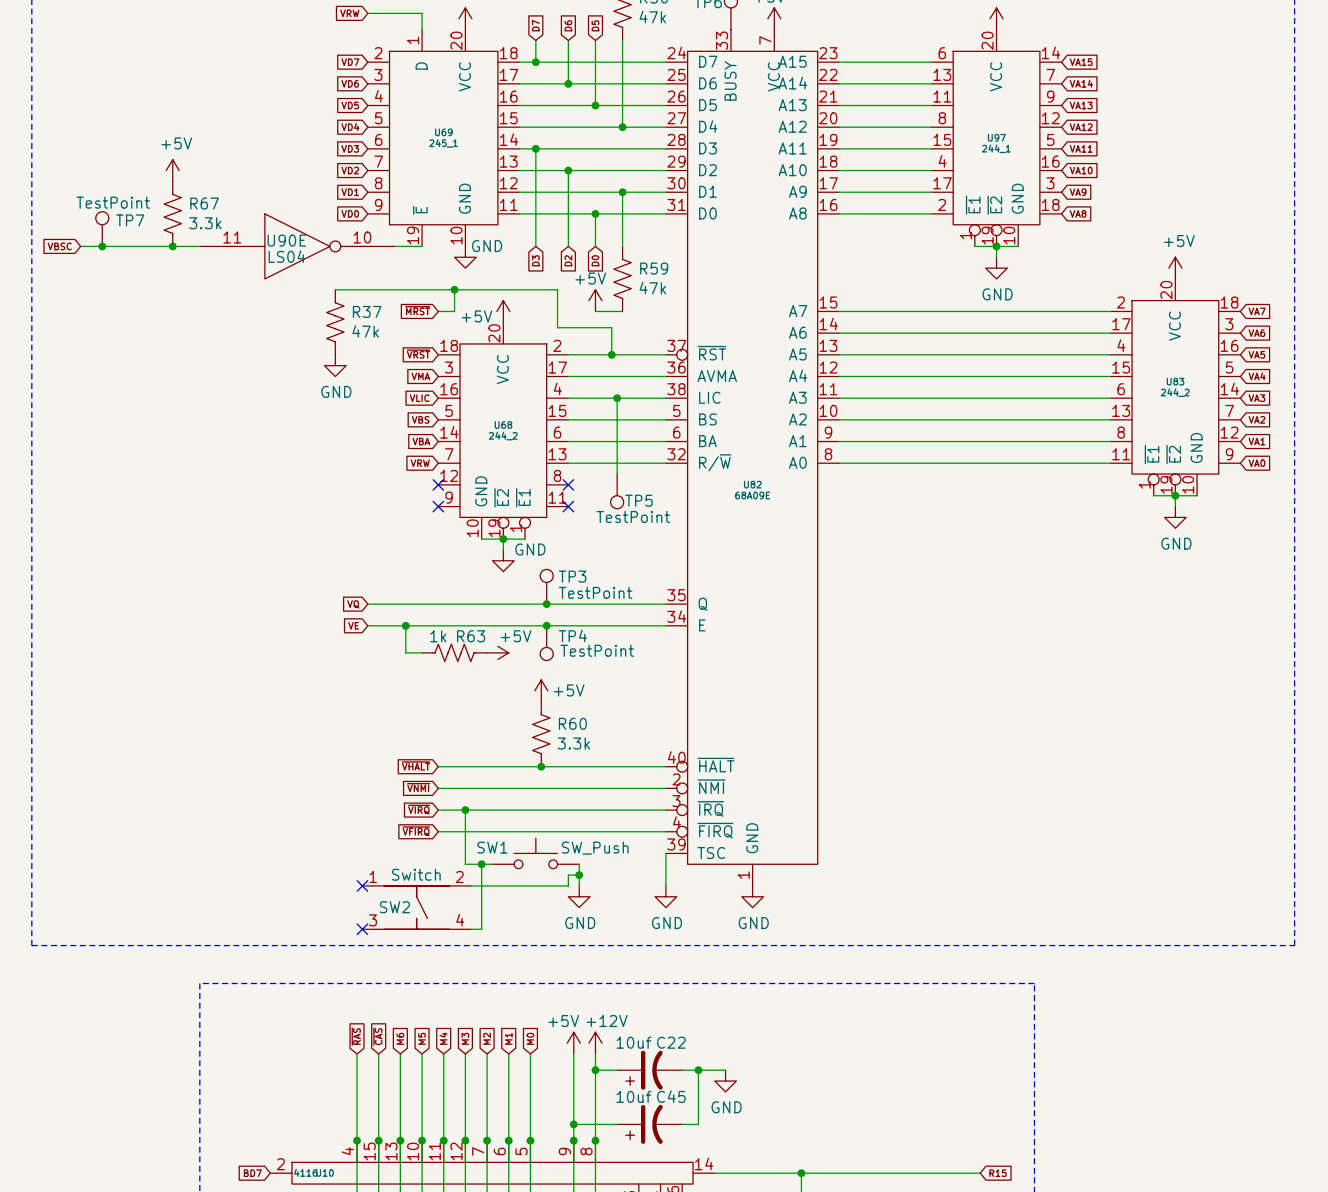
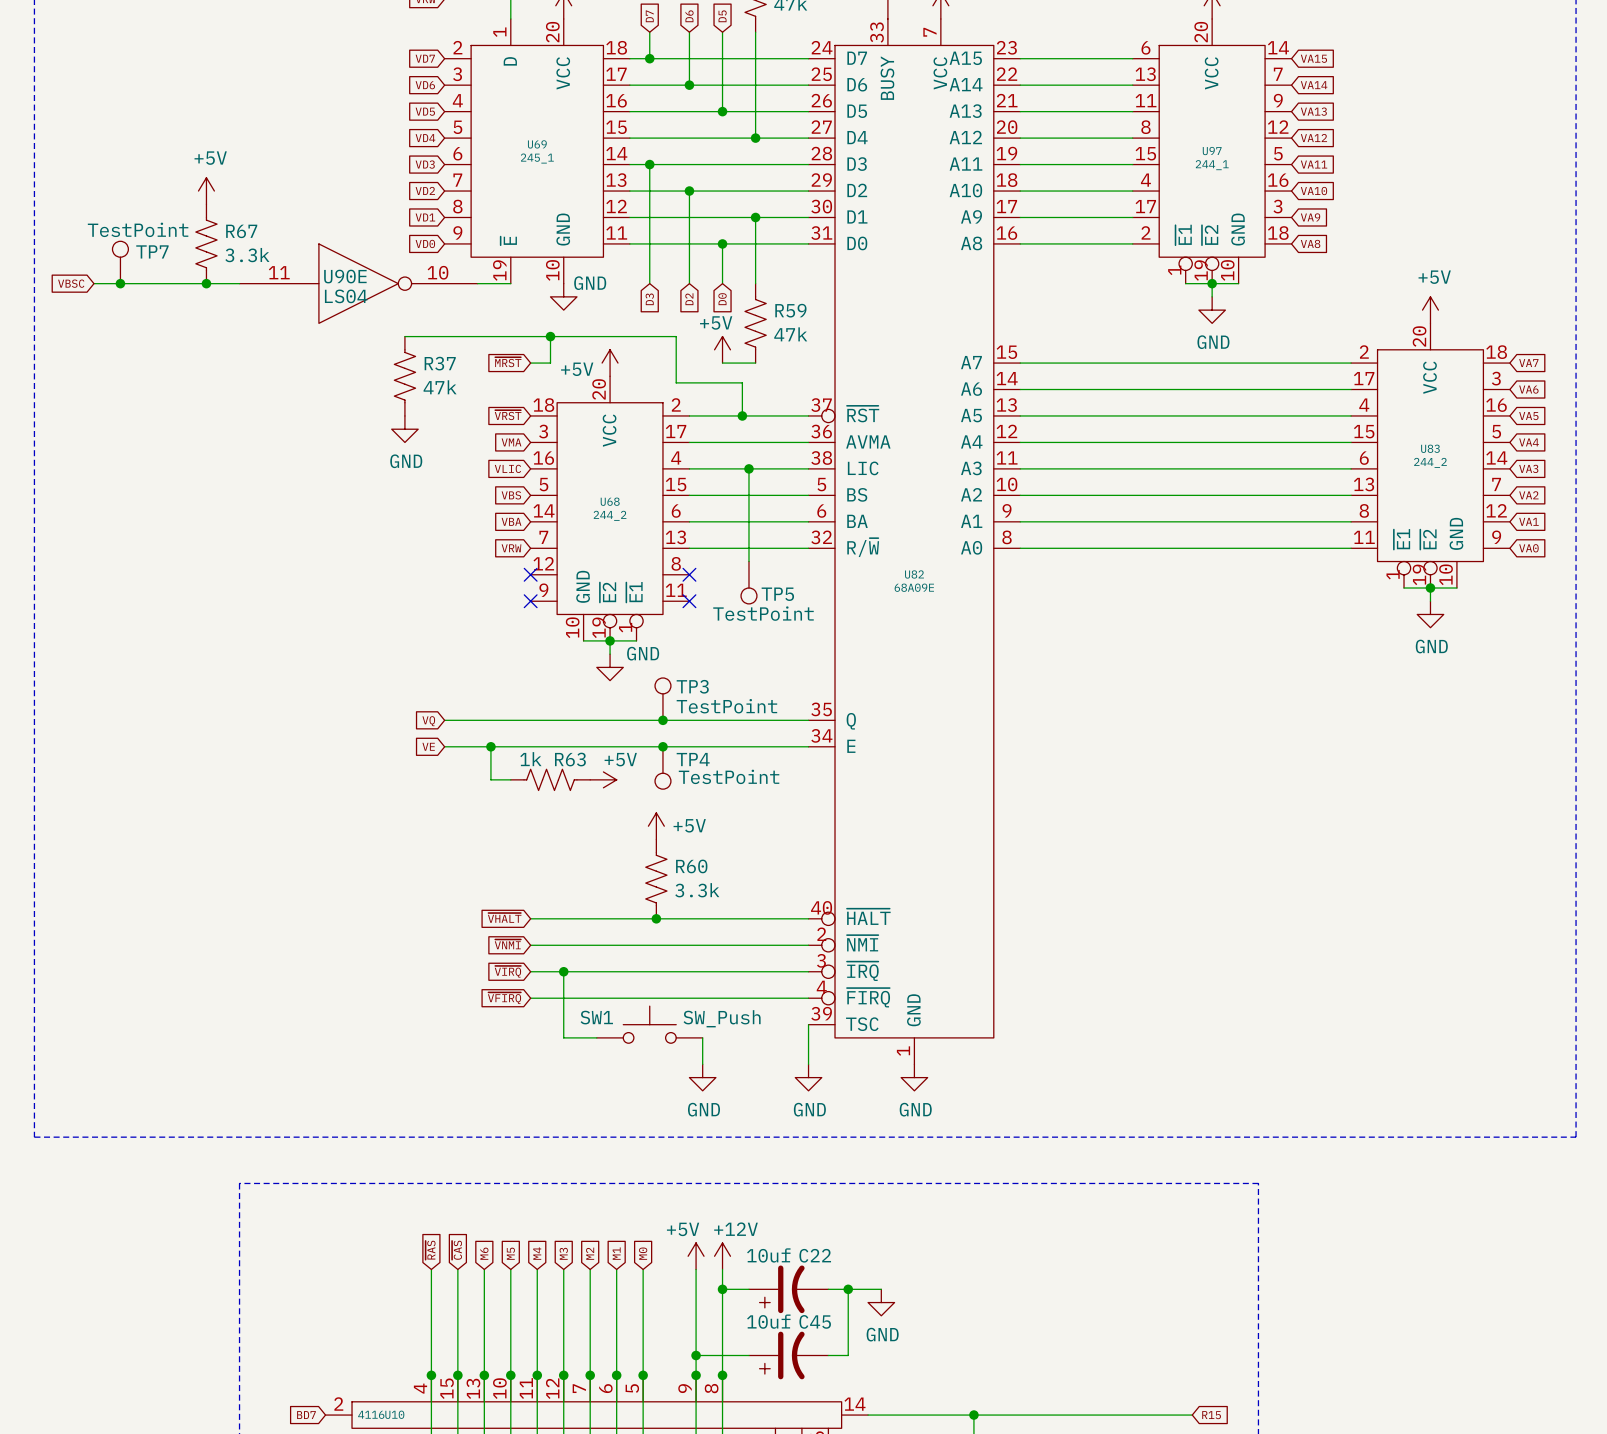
wire: (481, 864) (481, 929) (470, 929) -> none
junction: (481, 864) -> none
wire: (579, 875) (568, 875) (568, 885) (470, 885) -> none
junction: (579, 875) -> none
no-connect mark: (362, 885) -> none
SW2: Switch (416, 907) -> none
no-connect mark: (362, 929) -> none

